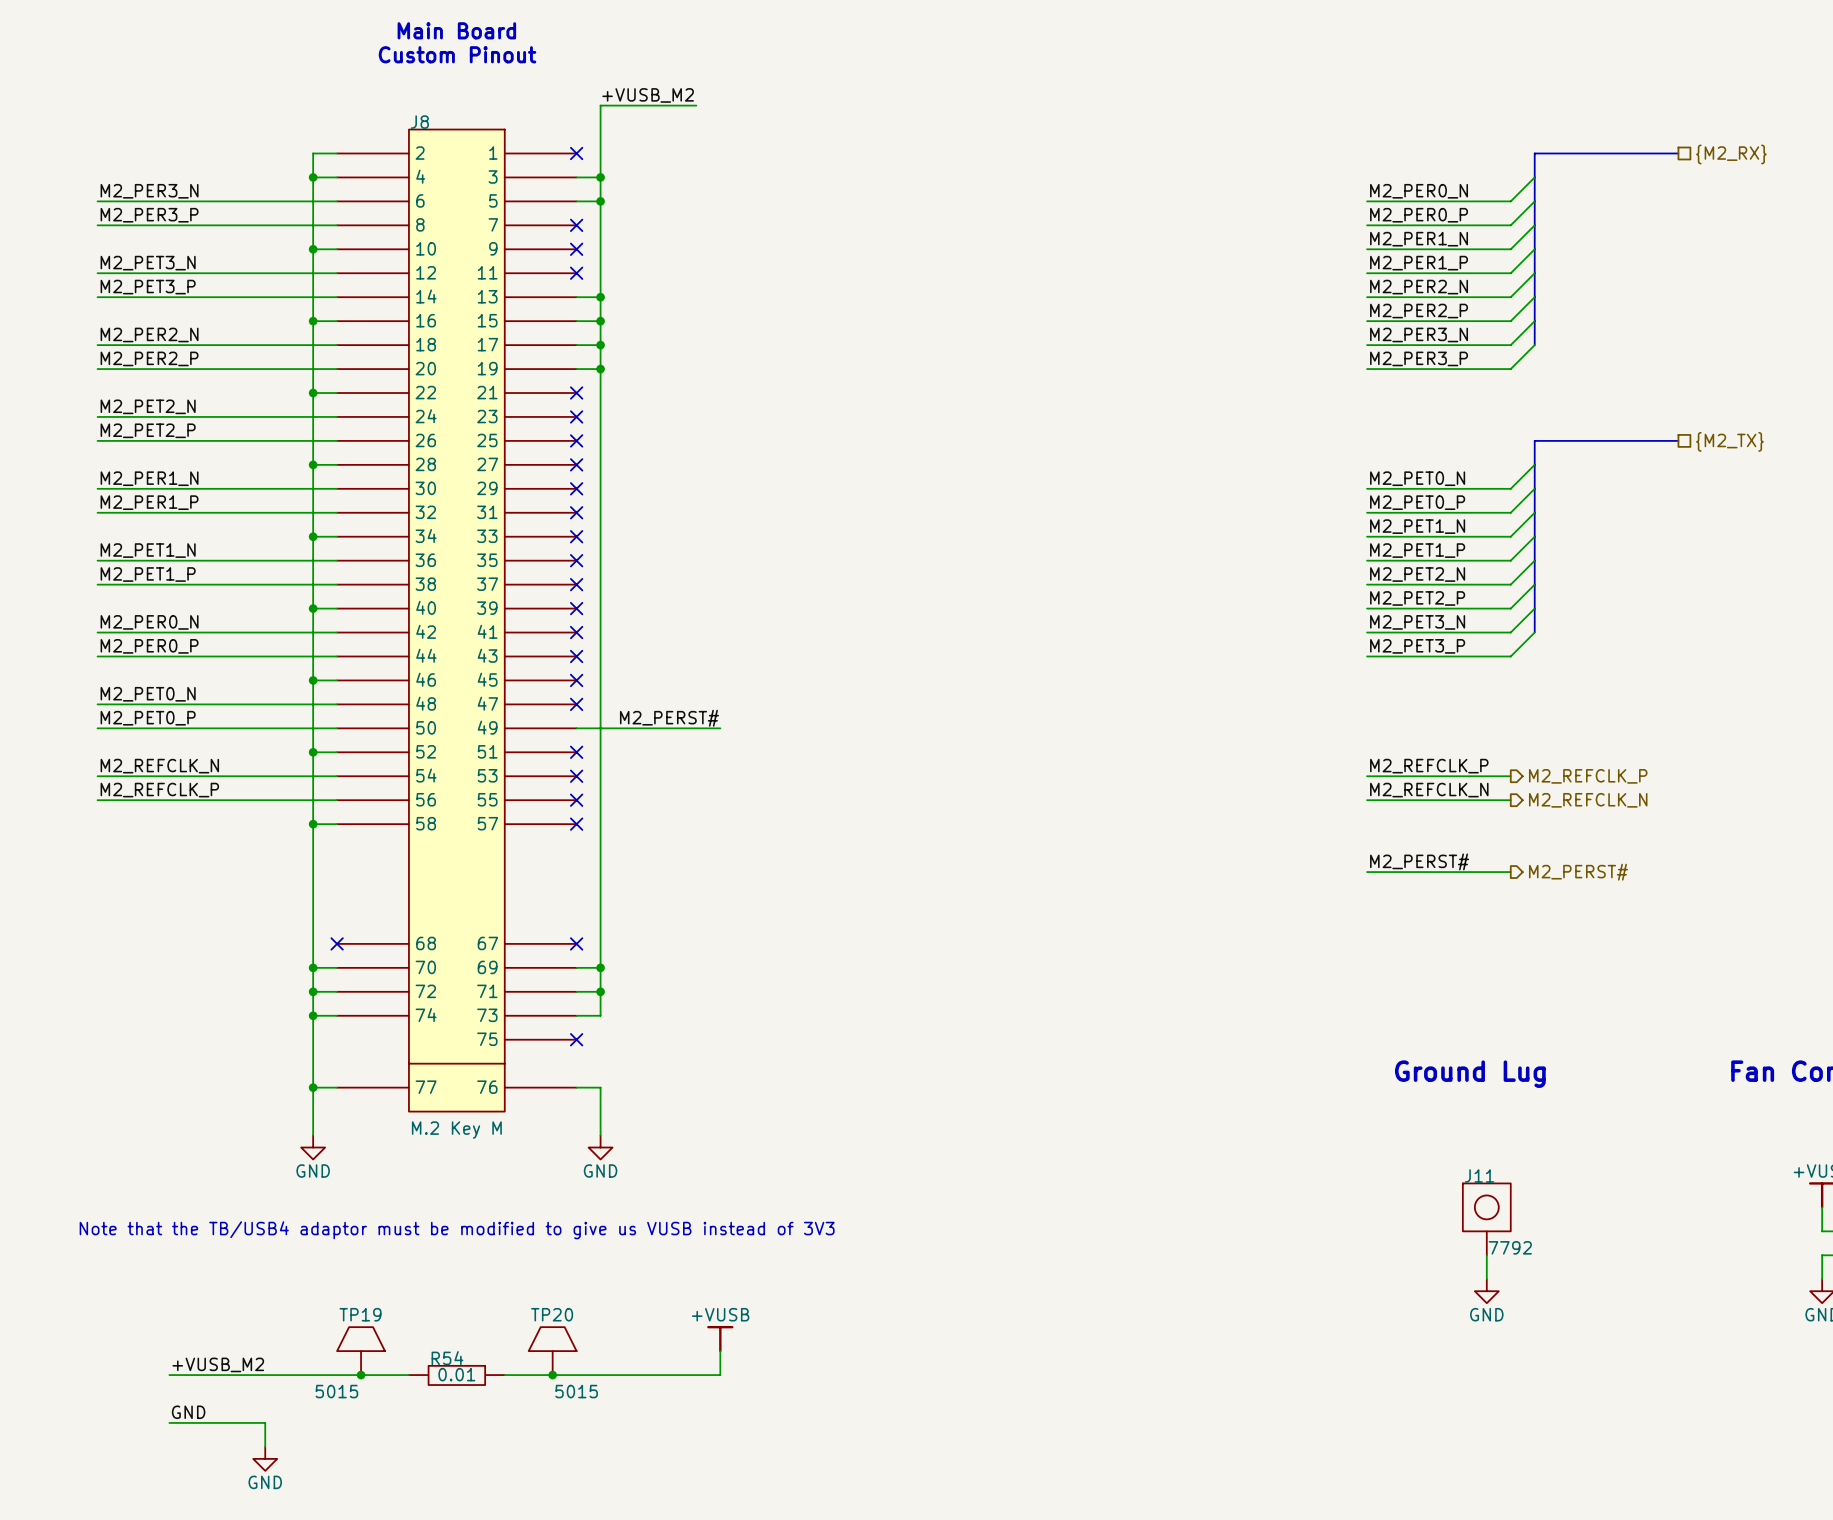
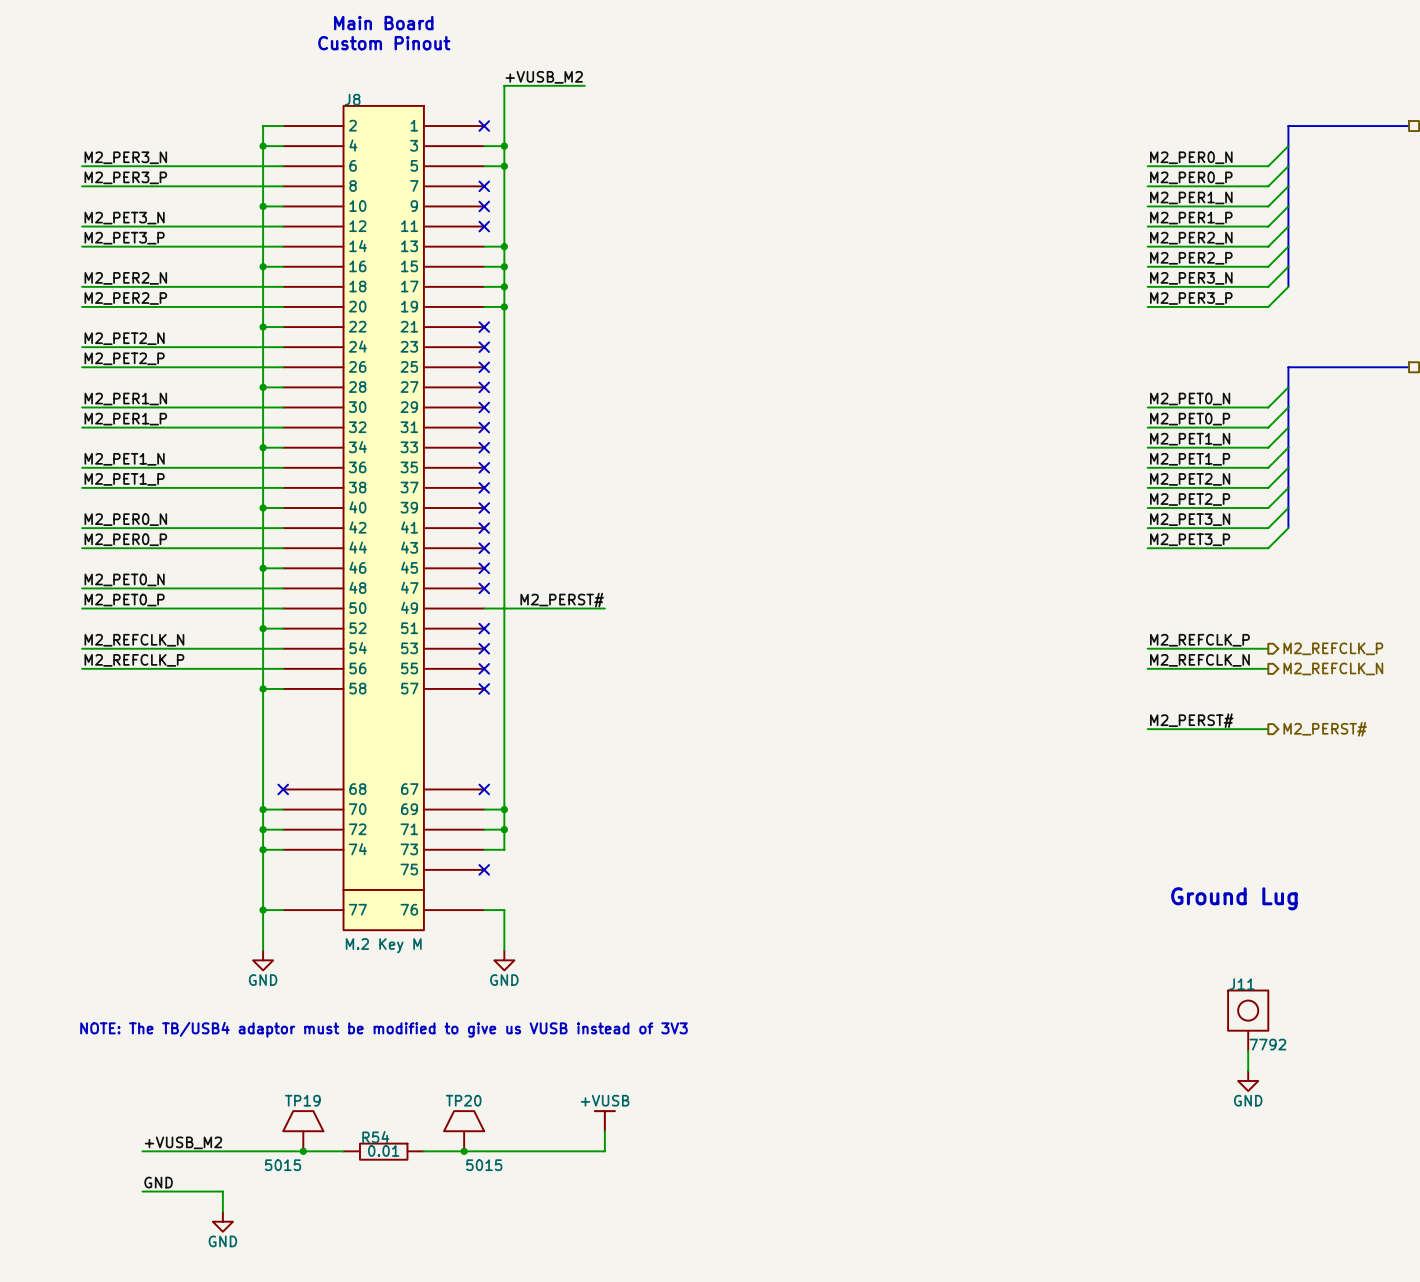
text: Note that the TB/USB4 adaptor must be modified to give us VUSB instead of 3V3 (457, 1230) -> NOTE: The TB/USB4 adaptor must be modified to give us VUSB instead of 3V3 (383, 1029)

